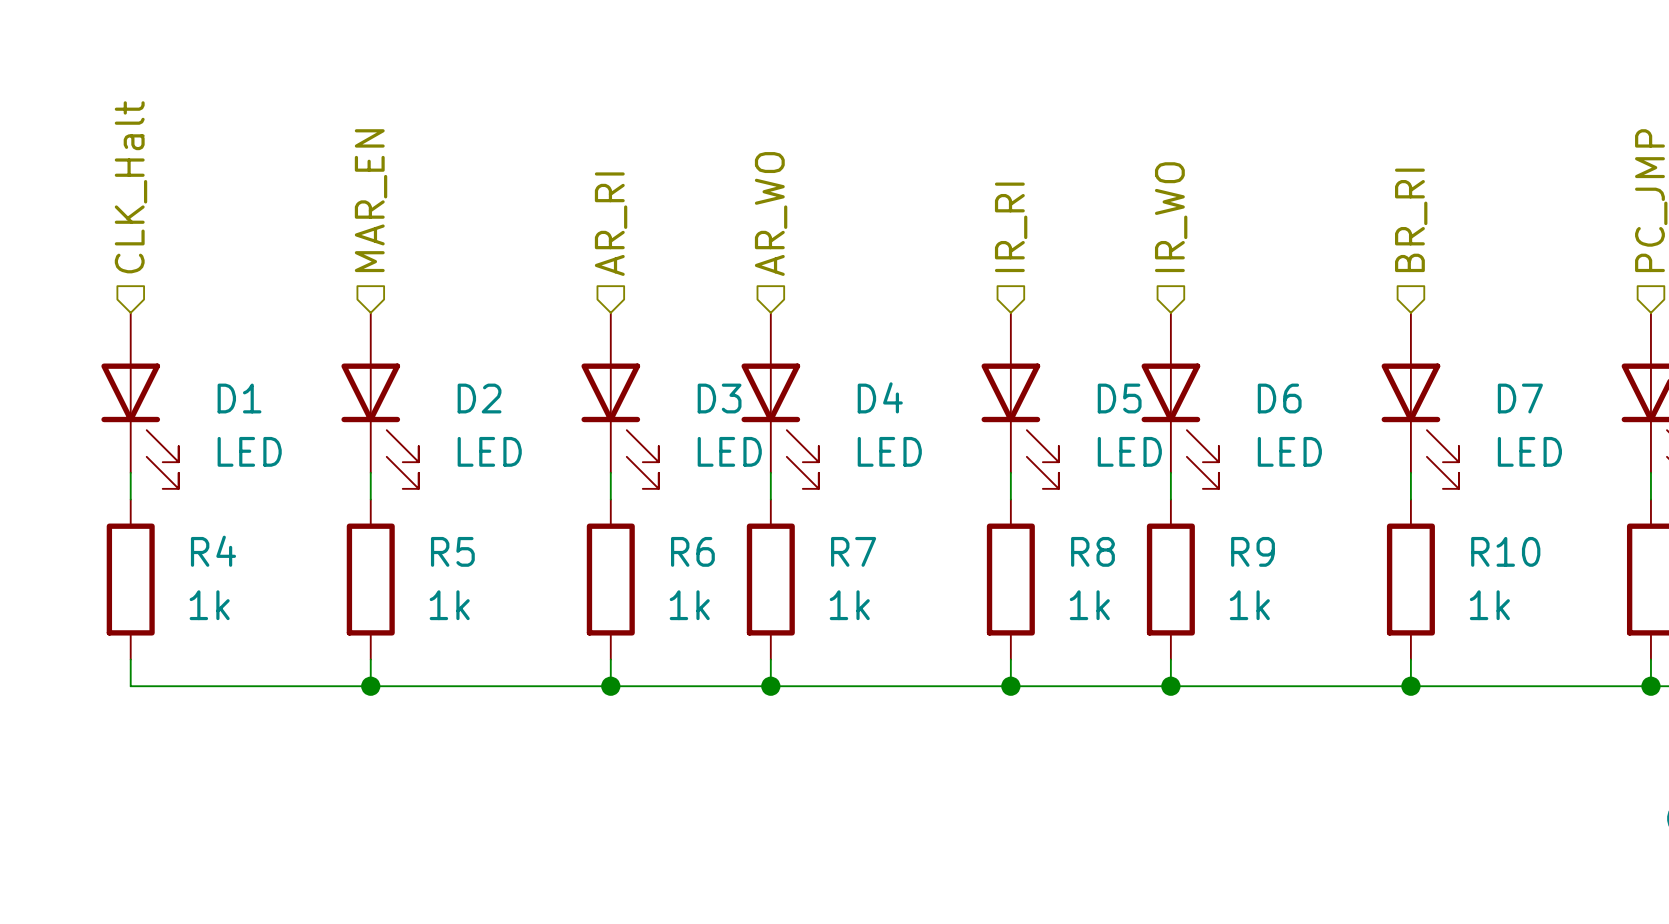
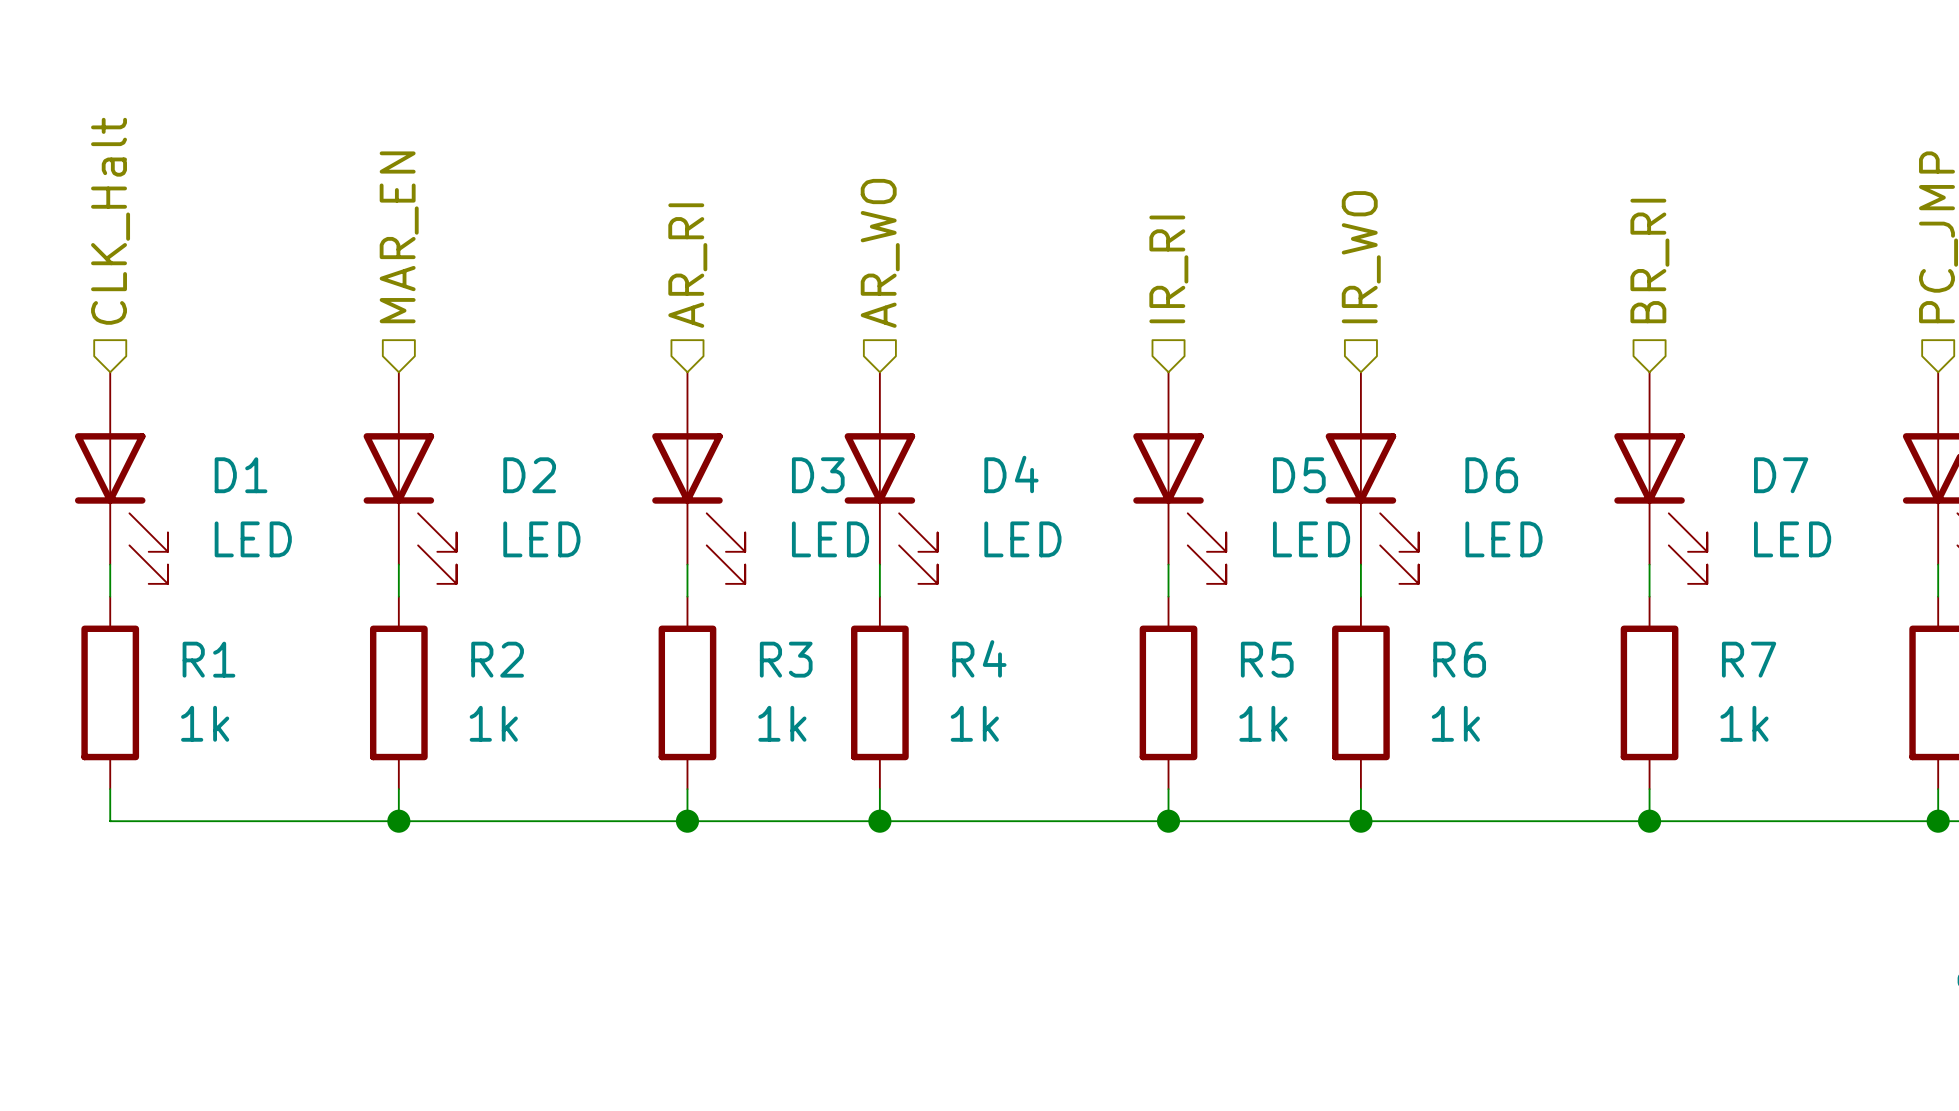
R4 name: R4 (213, 551) -> R1 (208, 659)
R5 name: R5 (452, 551) -> R2 (497, 659)
R6 name: R6 (692, 551) -> R3 (786, 659)
R7 name: R7 (853, 551) -> R4 (979, 658)
R8 name: R8 (1092, 551) -> R5 (1267, 659)
R9 name: R9 (1253, 551) -> R6 (1459, 659)
R10 name: R10 (1505, 551) -> R7 (1749, 659)

